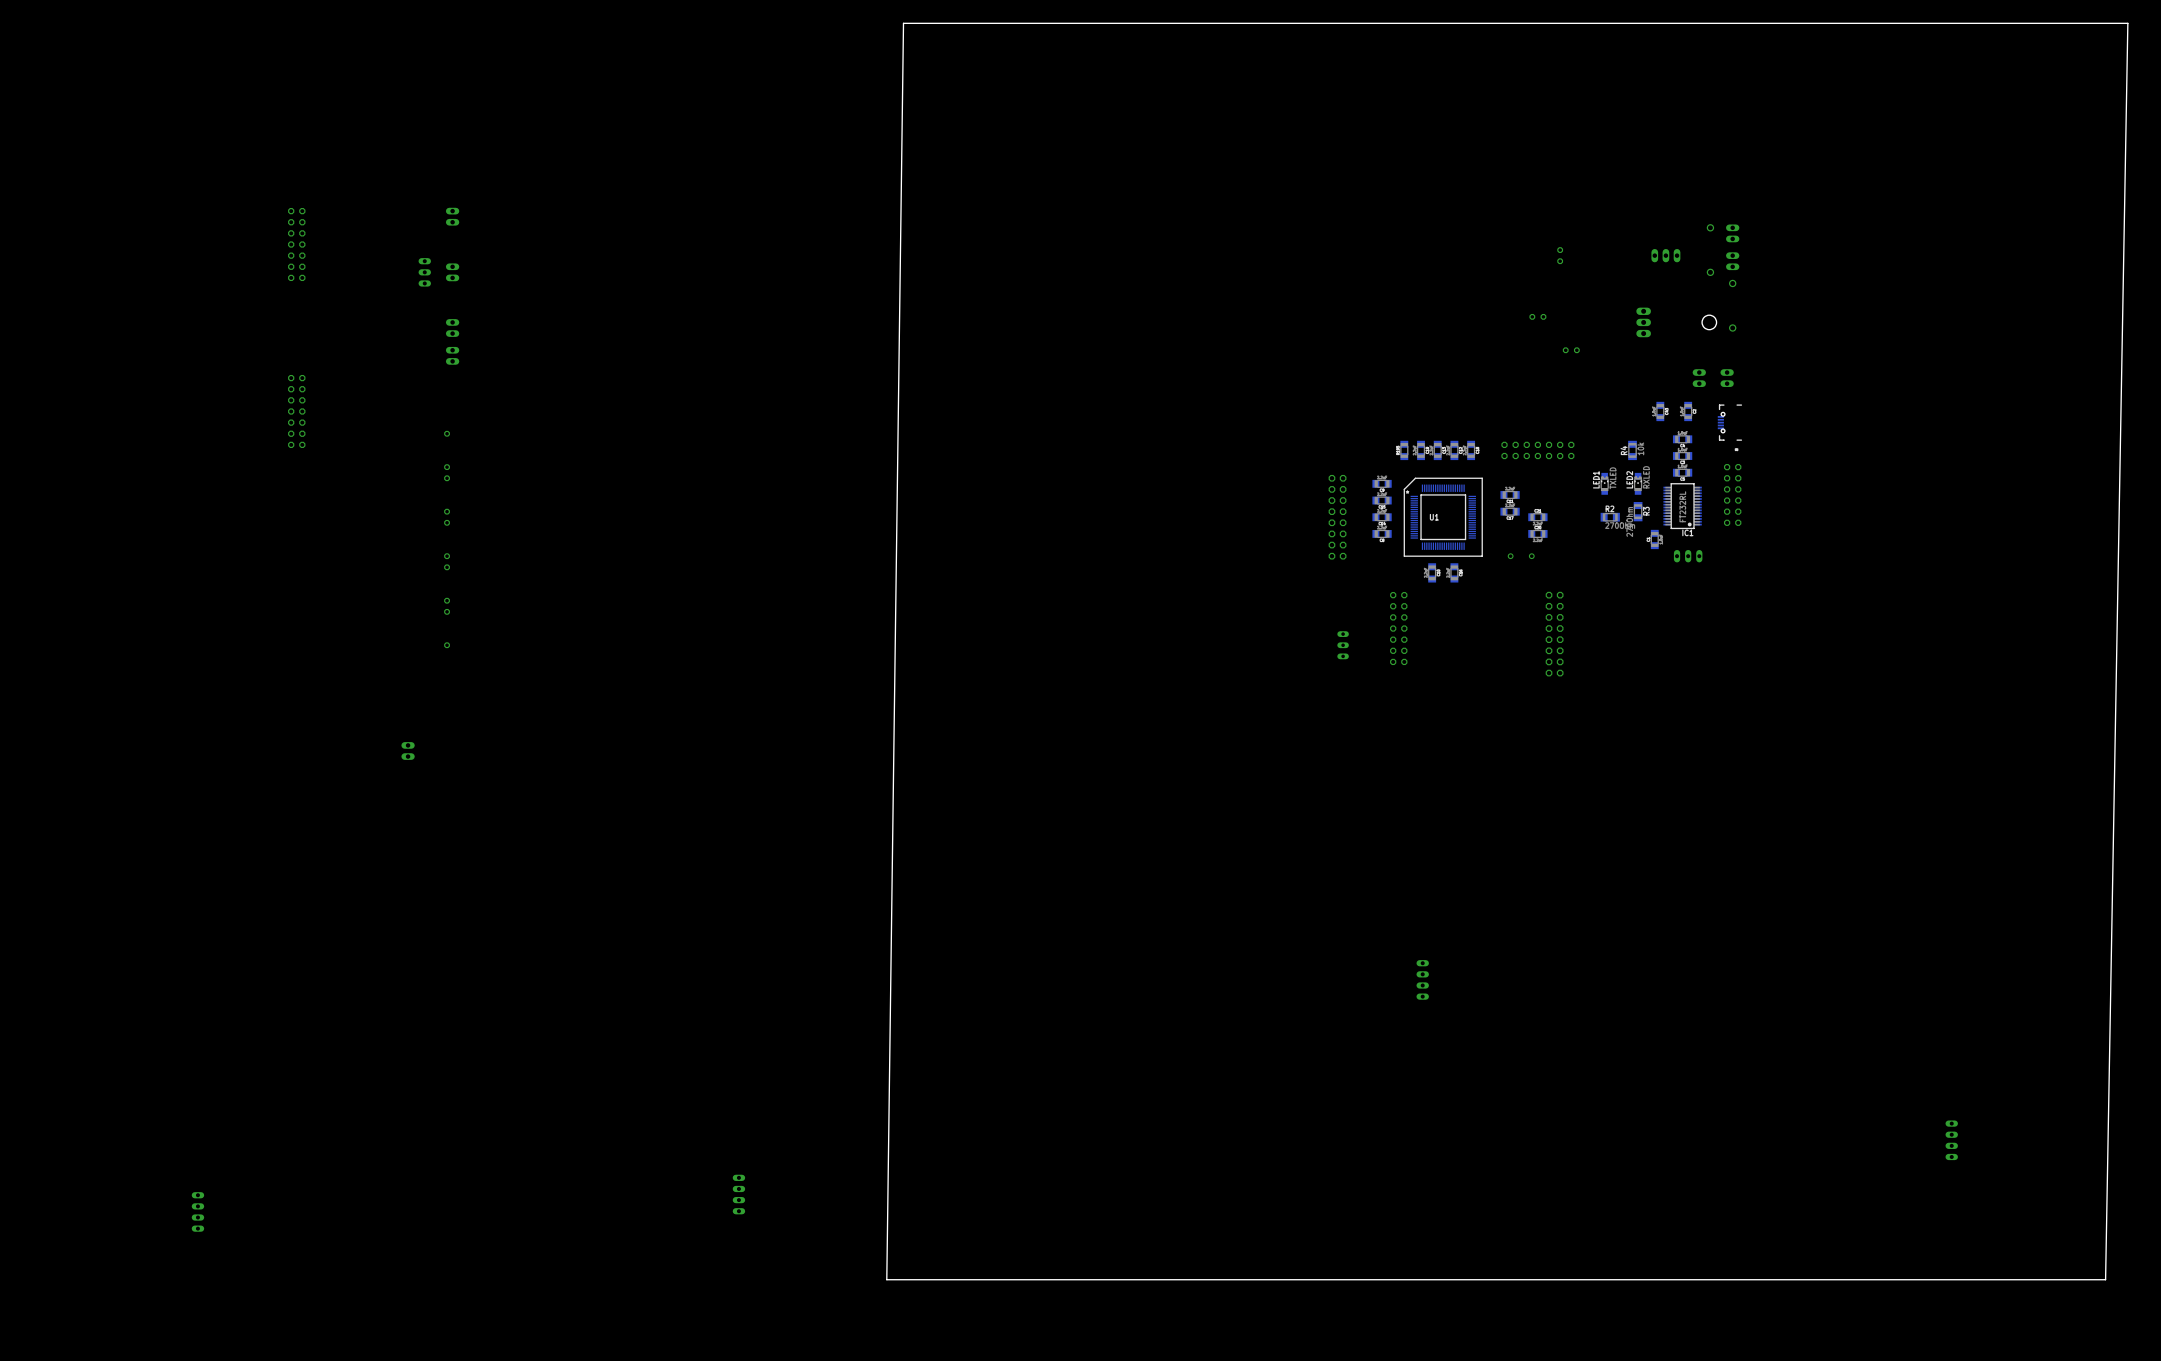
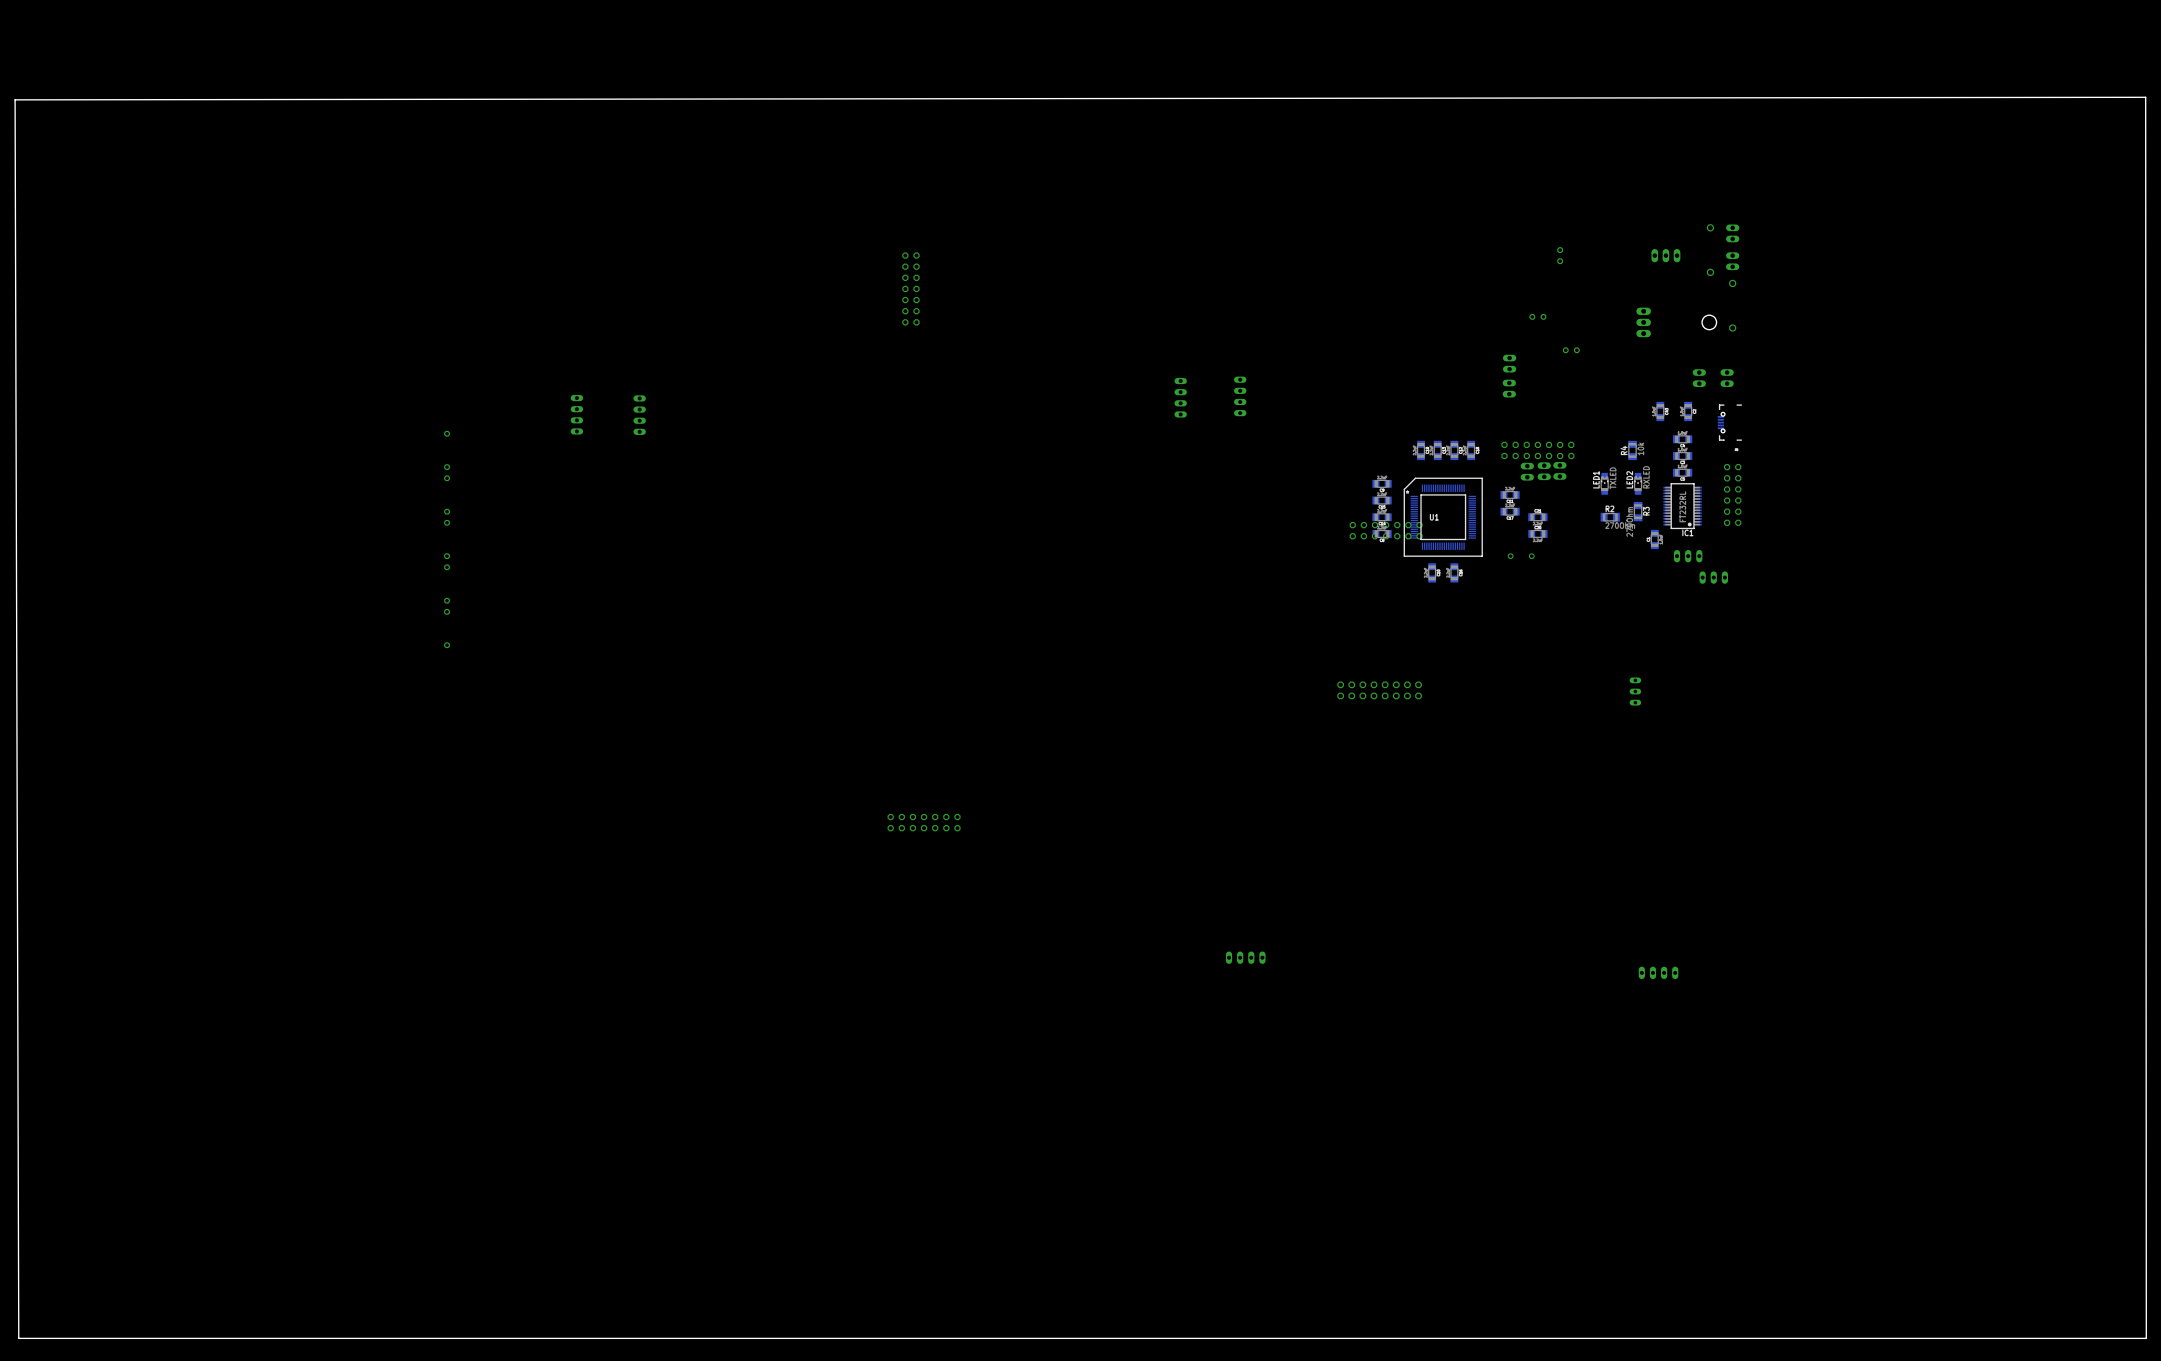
board edge: (2127, 23) (903, 23) (886, 1279) (2105, 1279) (2127, 23) -> (2145, 97) (2146, 1338) (18, 1338) (15, 99) (2145, 97)
part: (452, 216) -> none
part: (296, 244) -> none
part: (424, 272) -> none
part: (452, 272) -> none
part: none -> (910, 288)
part: (452, 328) -> none
part: (452, 355) -> none
part: none -> (1509, 363)
part: none -> (1509, 388)
part: none -> (1240, 396)
part: none -> (1180, 397)
part: (296, 411) -> none
part: none -> (576, 414)
part: none -> (639, 415)
part: (1404, 450) -> none
part: none -> (1559, 470)
part: none -> (1527, 471)
part: none -> (1544, 471)
part: (1337, 517) -> none
part: none -> (1713, 577)
part rotation: 0° (1398, 628) -> 90° clockwise (1386, 530)
part position: (1398, 628) -> (1386, 530)
part: (1554, 634) -> none
part: (1343, 645) -> none
part: none -> (1379, 690)
part: none -> (1635, 691)
part: (408, 750) -> none
part: none -> (924, 822)
part: none -> (1245, 957)
part: none -> (1658, 972)
part: (1422, 979) -> none
part: (1951, 1140) -> none
part: (738, 1194) -> none
part: (197, 1211) -> none

